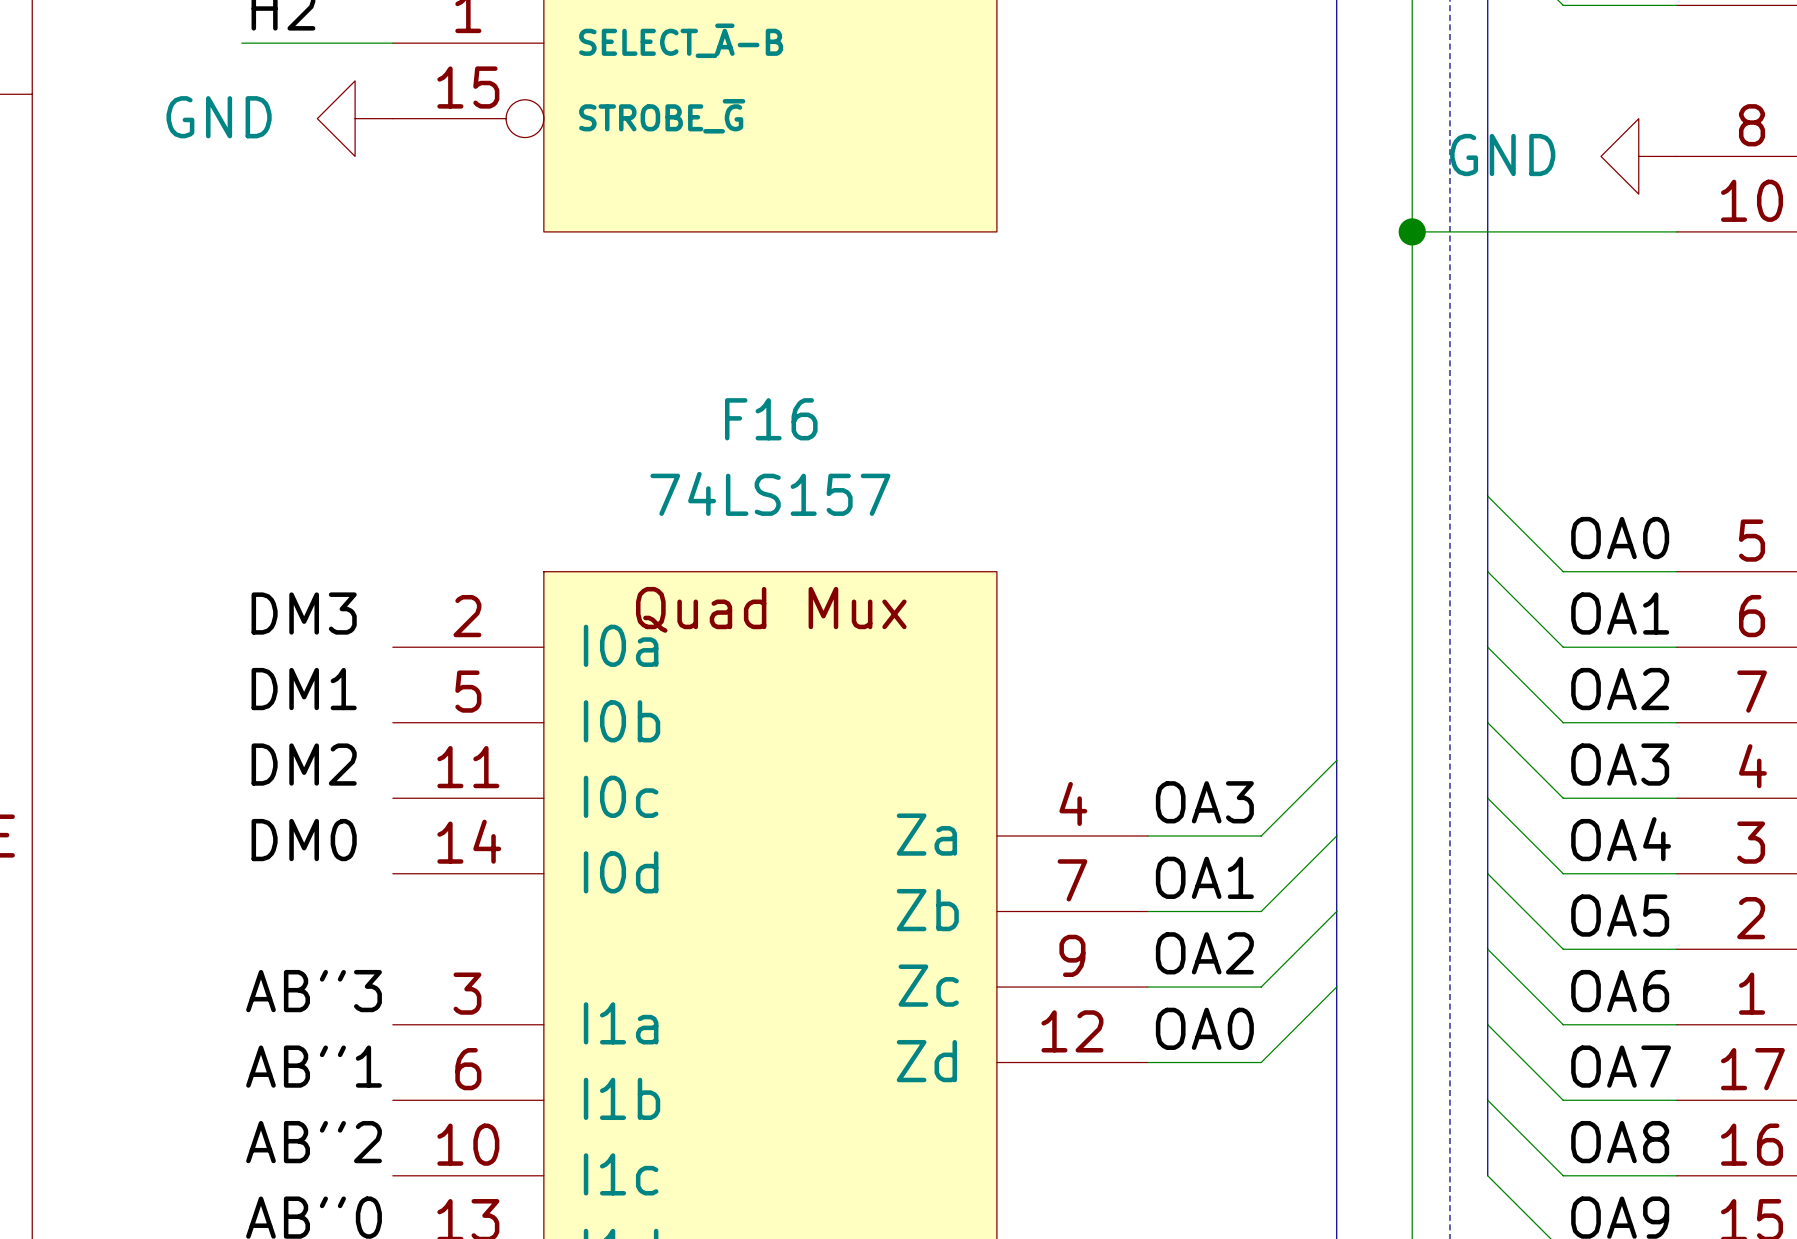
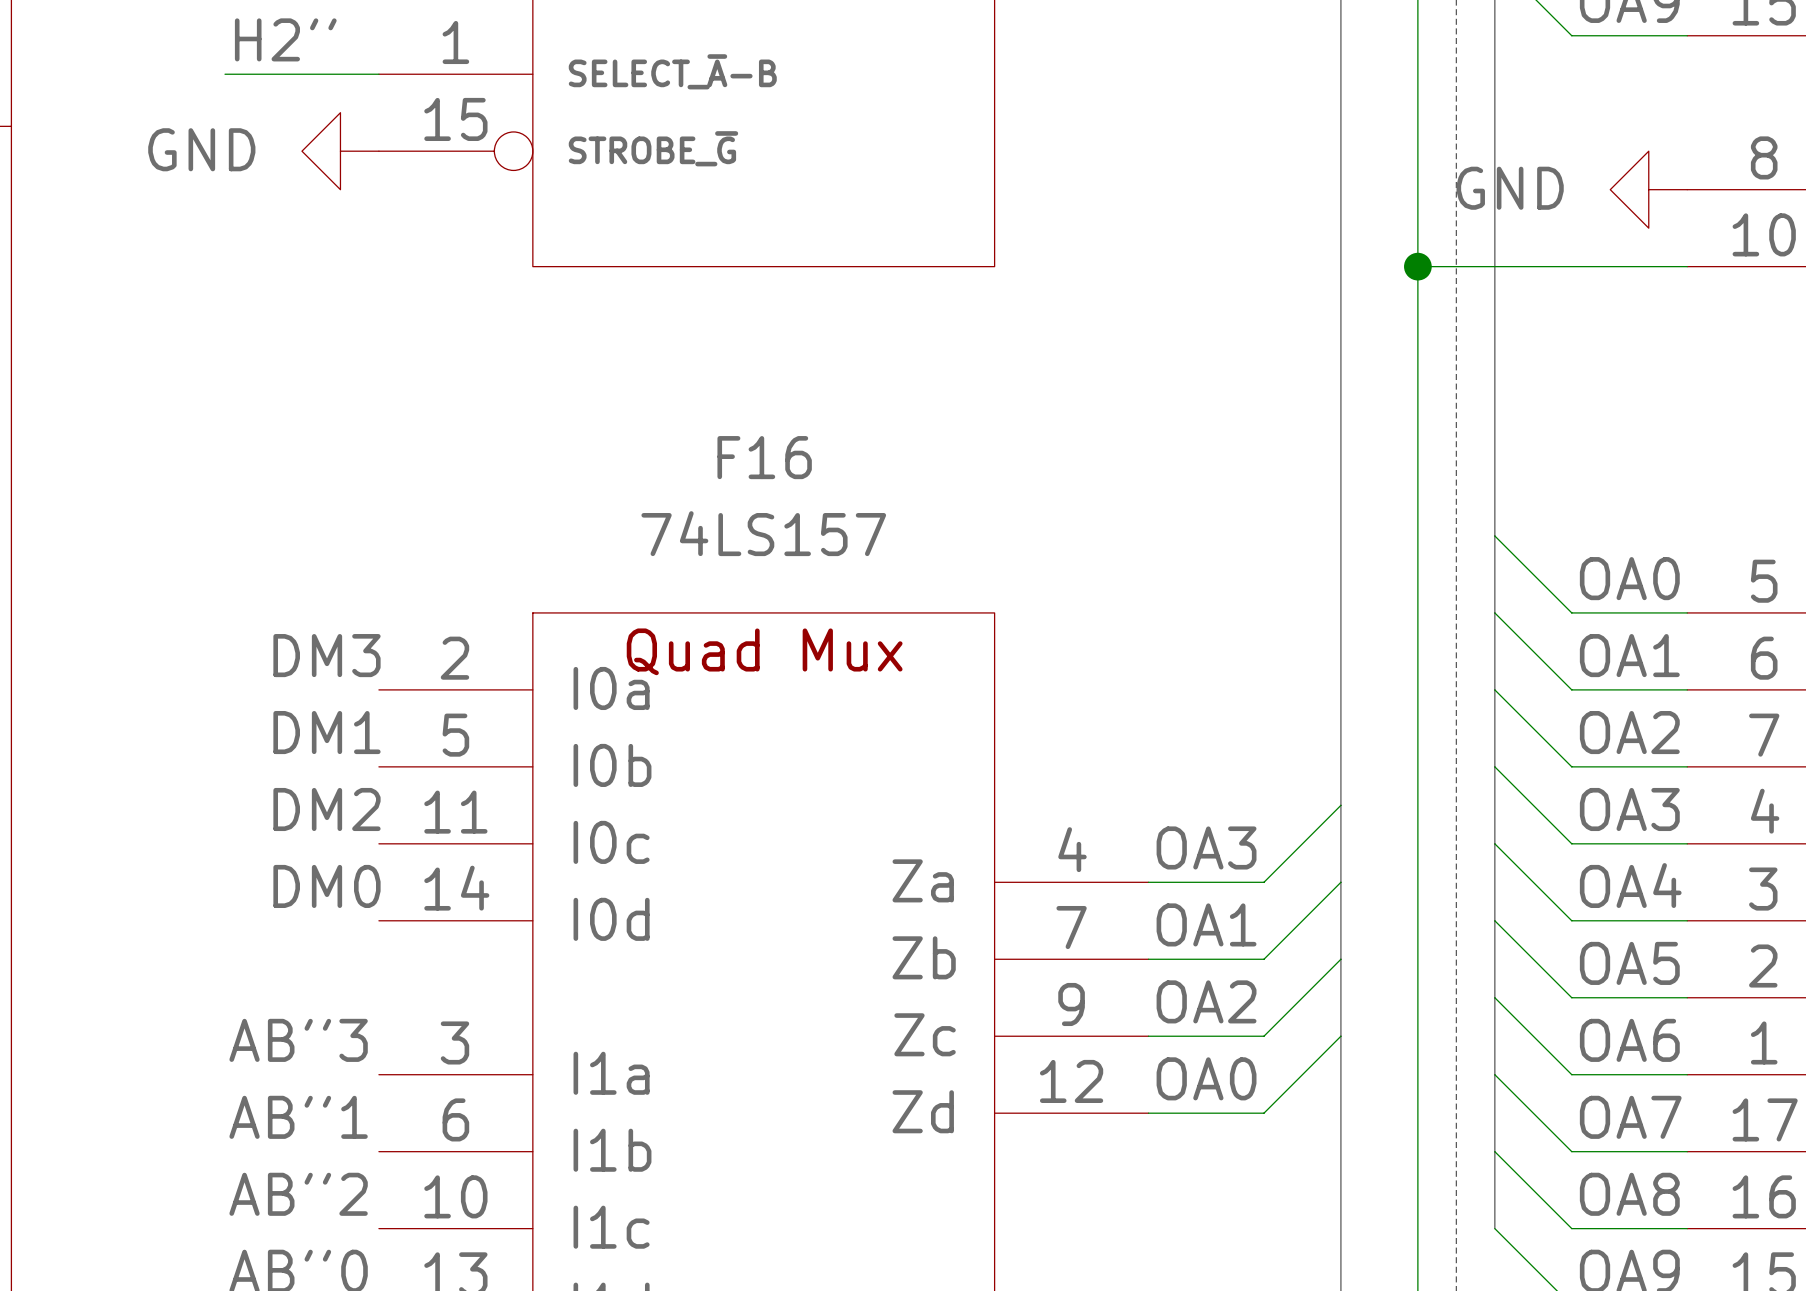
label position: DM3 (304, 613) -> DM3 (327, 655)
label position: DM1 (304, 689) -> DM1 (327, 732)
label position: DM2 (304, 764) -> DM2 (327, 809)
label position: DM0 (304, 840) -> DM0 (327, 886)

